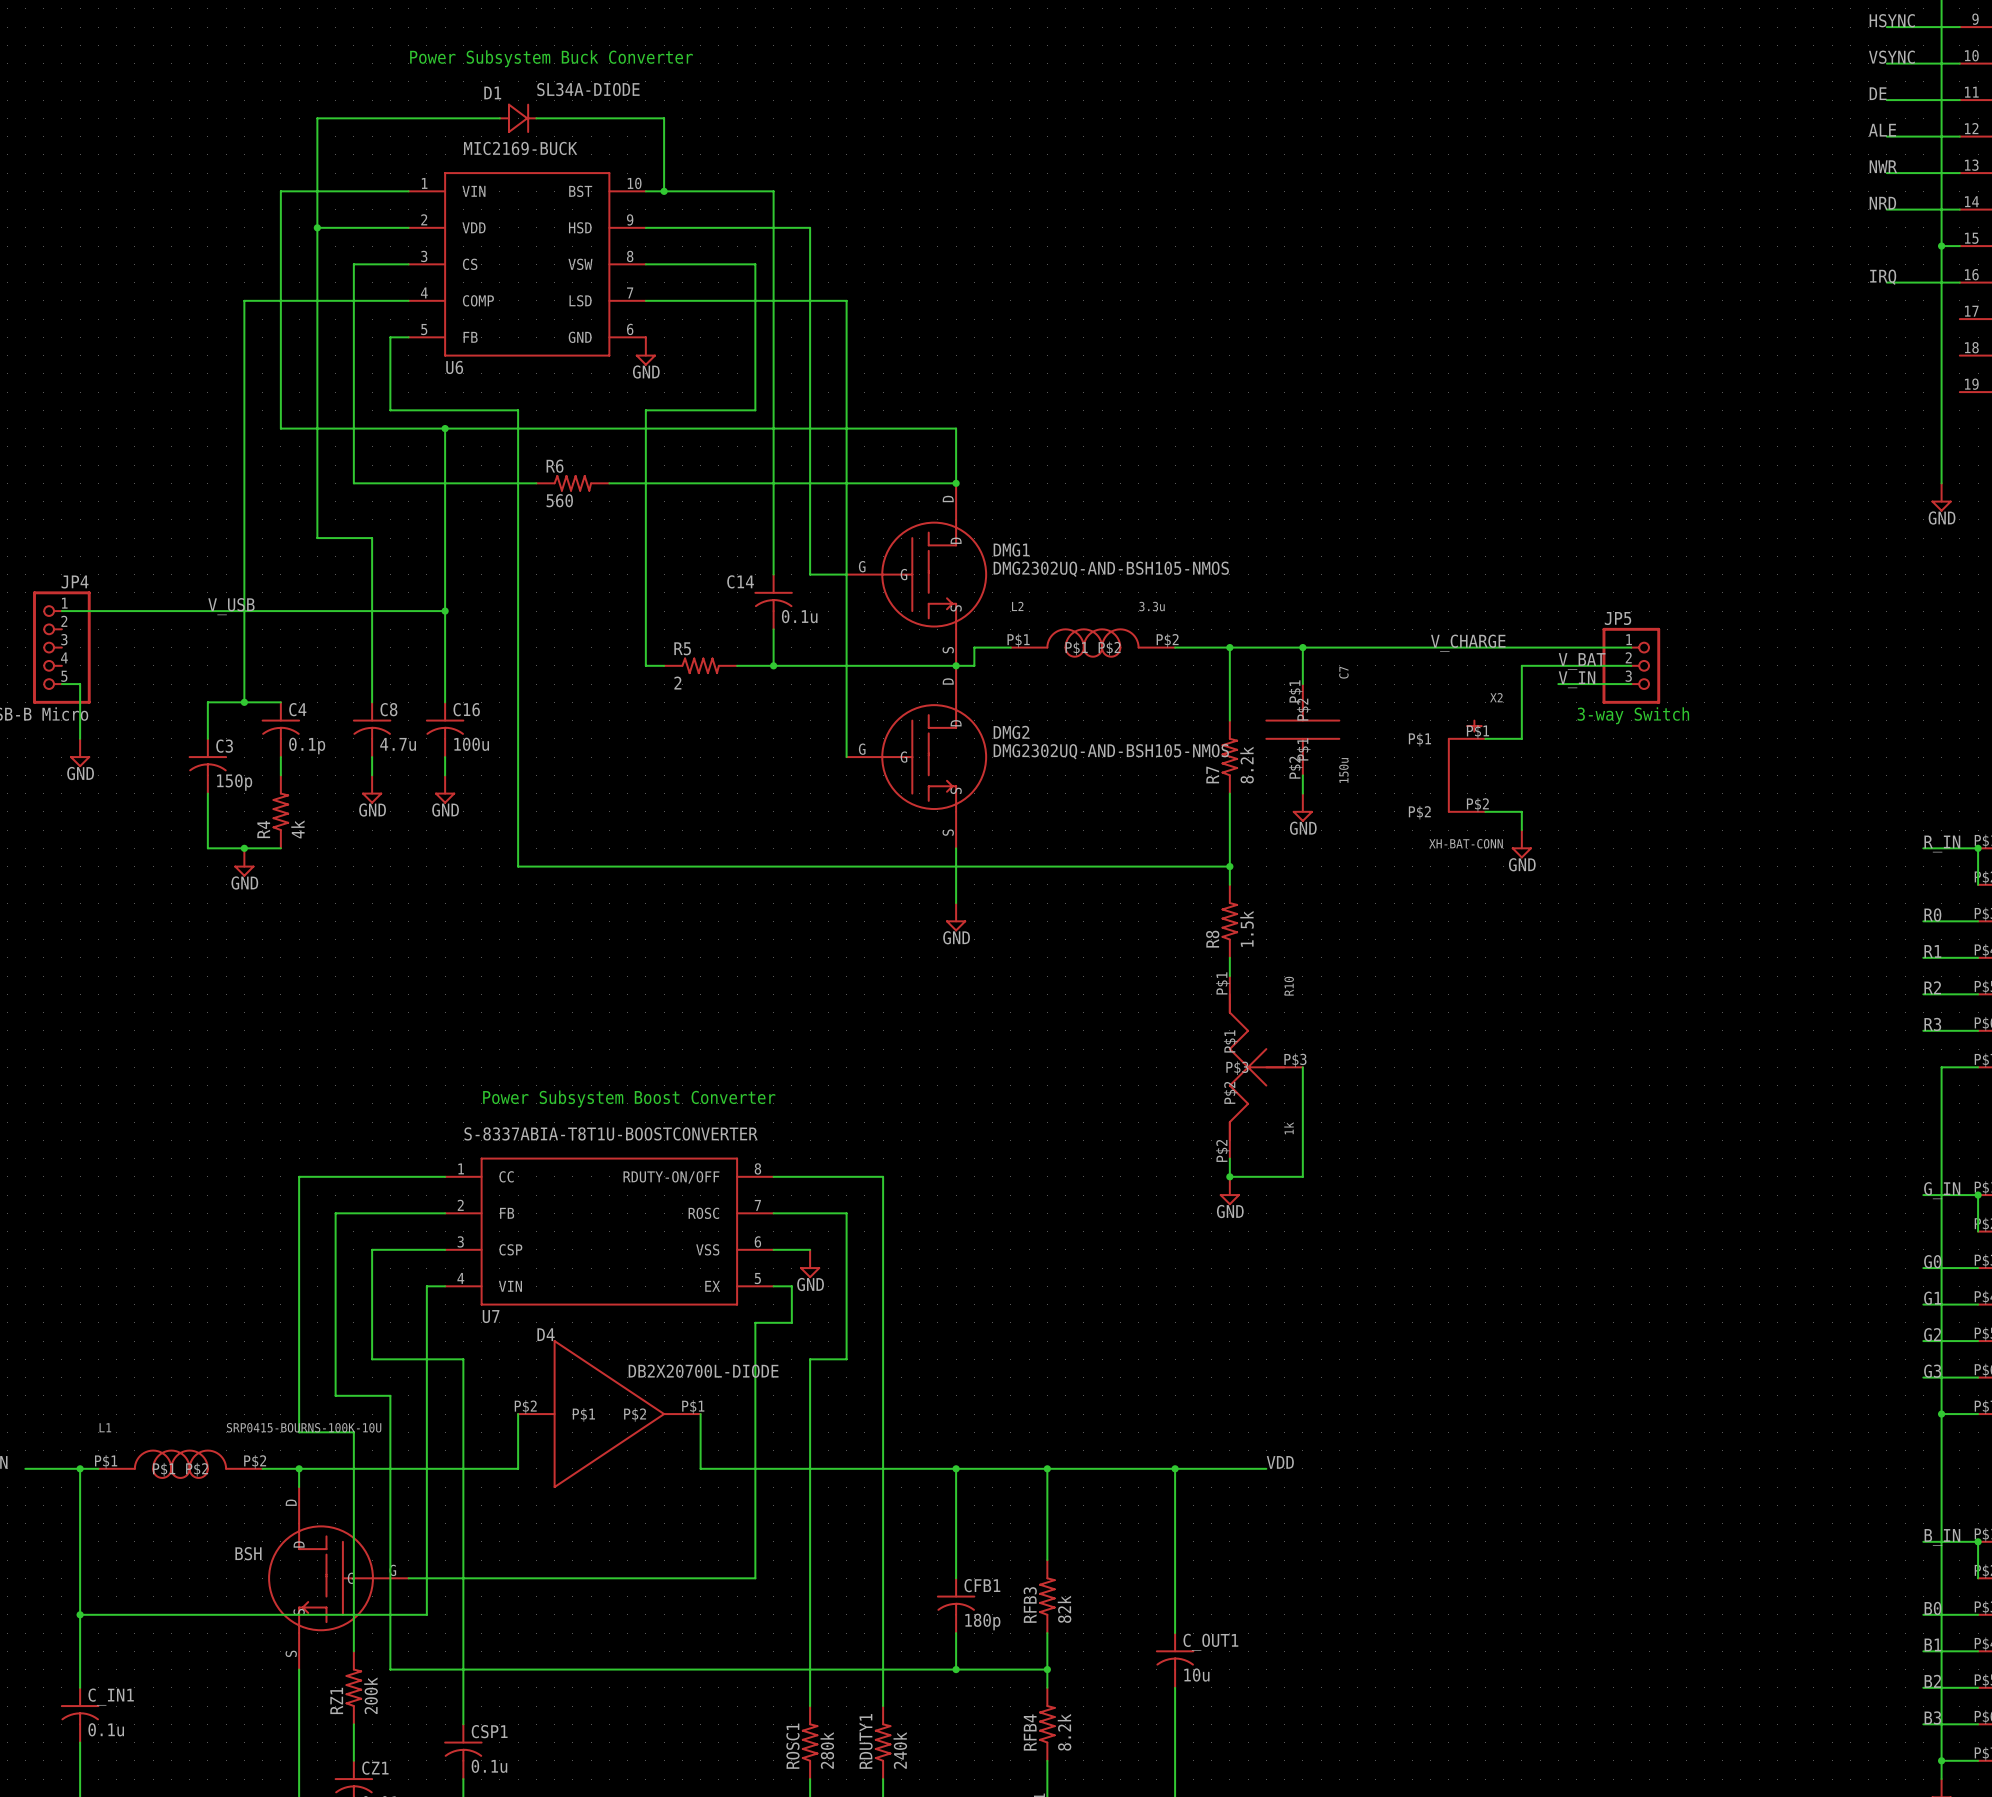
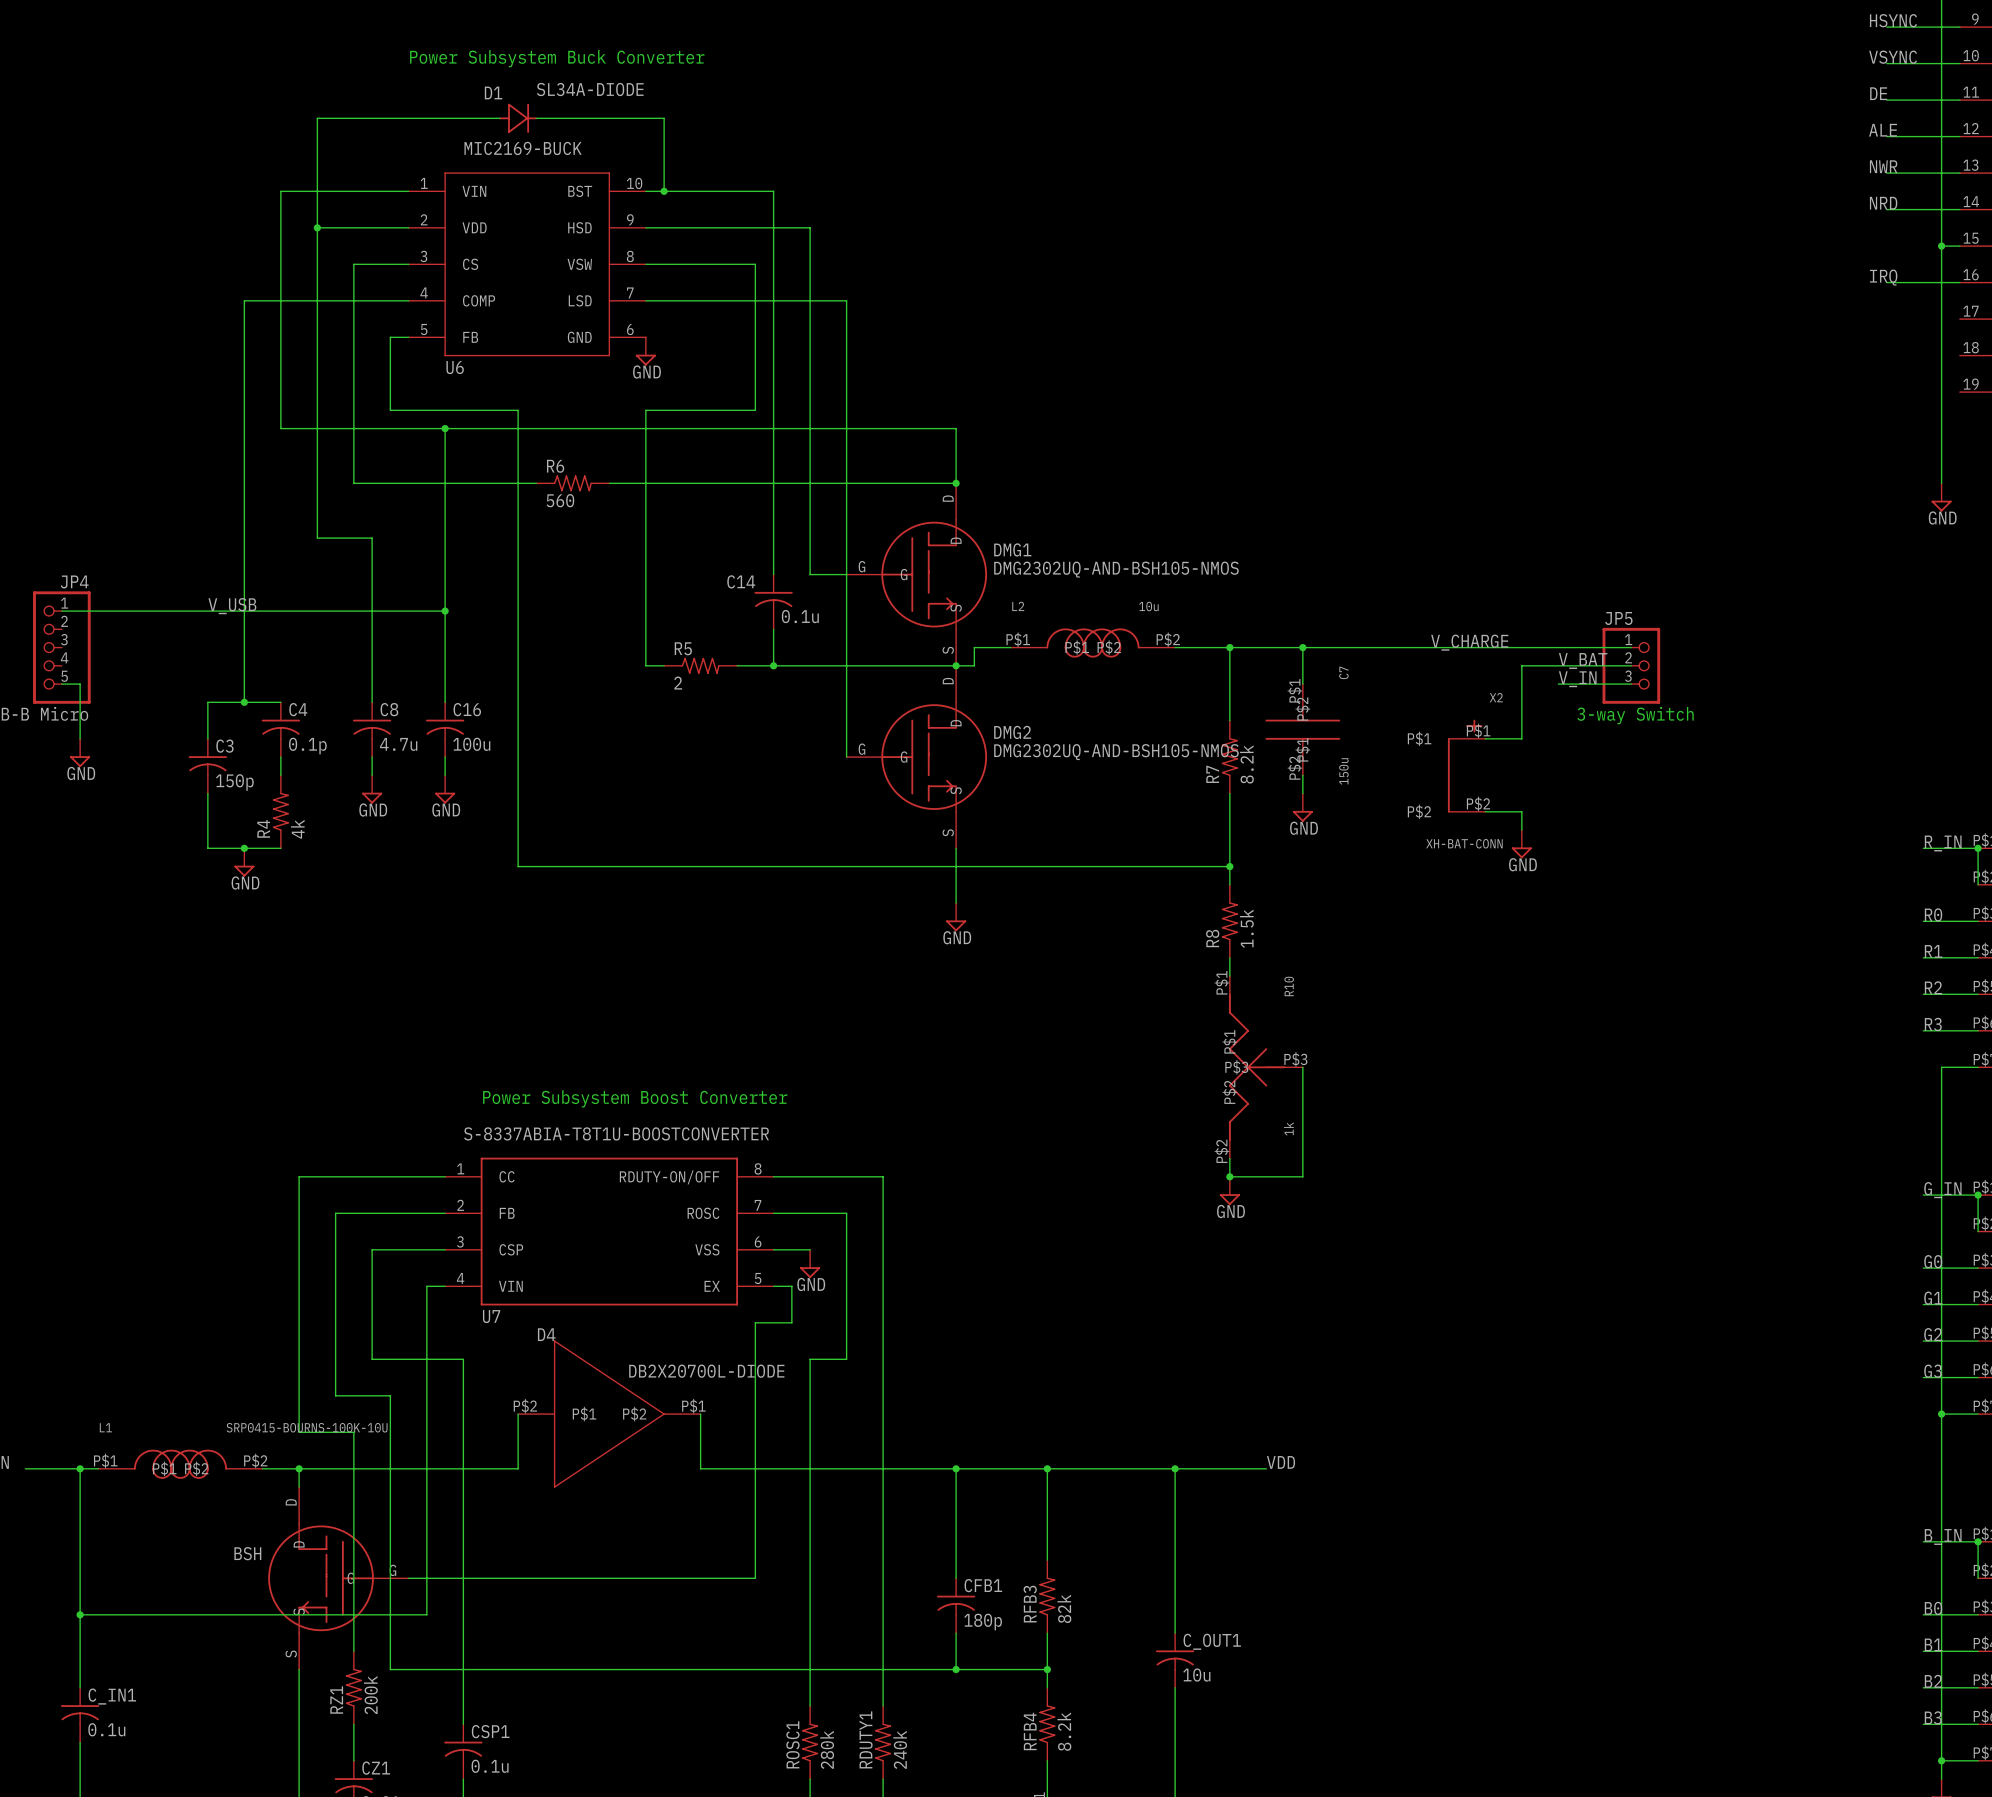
L2 value: 3.3u (1152, 606) -> 10u (1148, 606)

